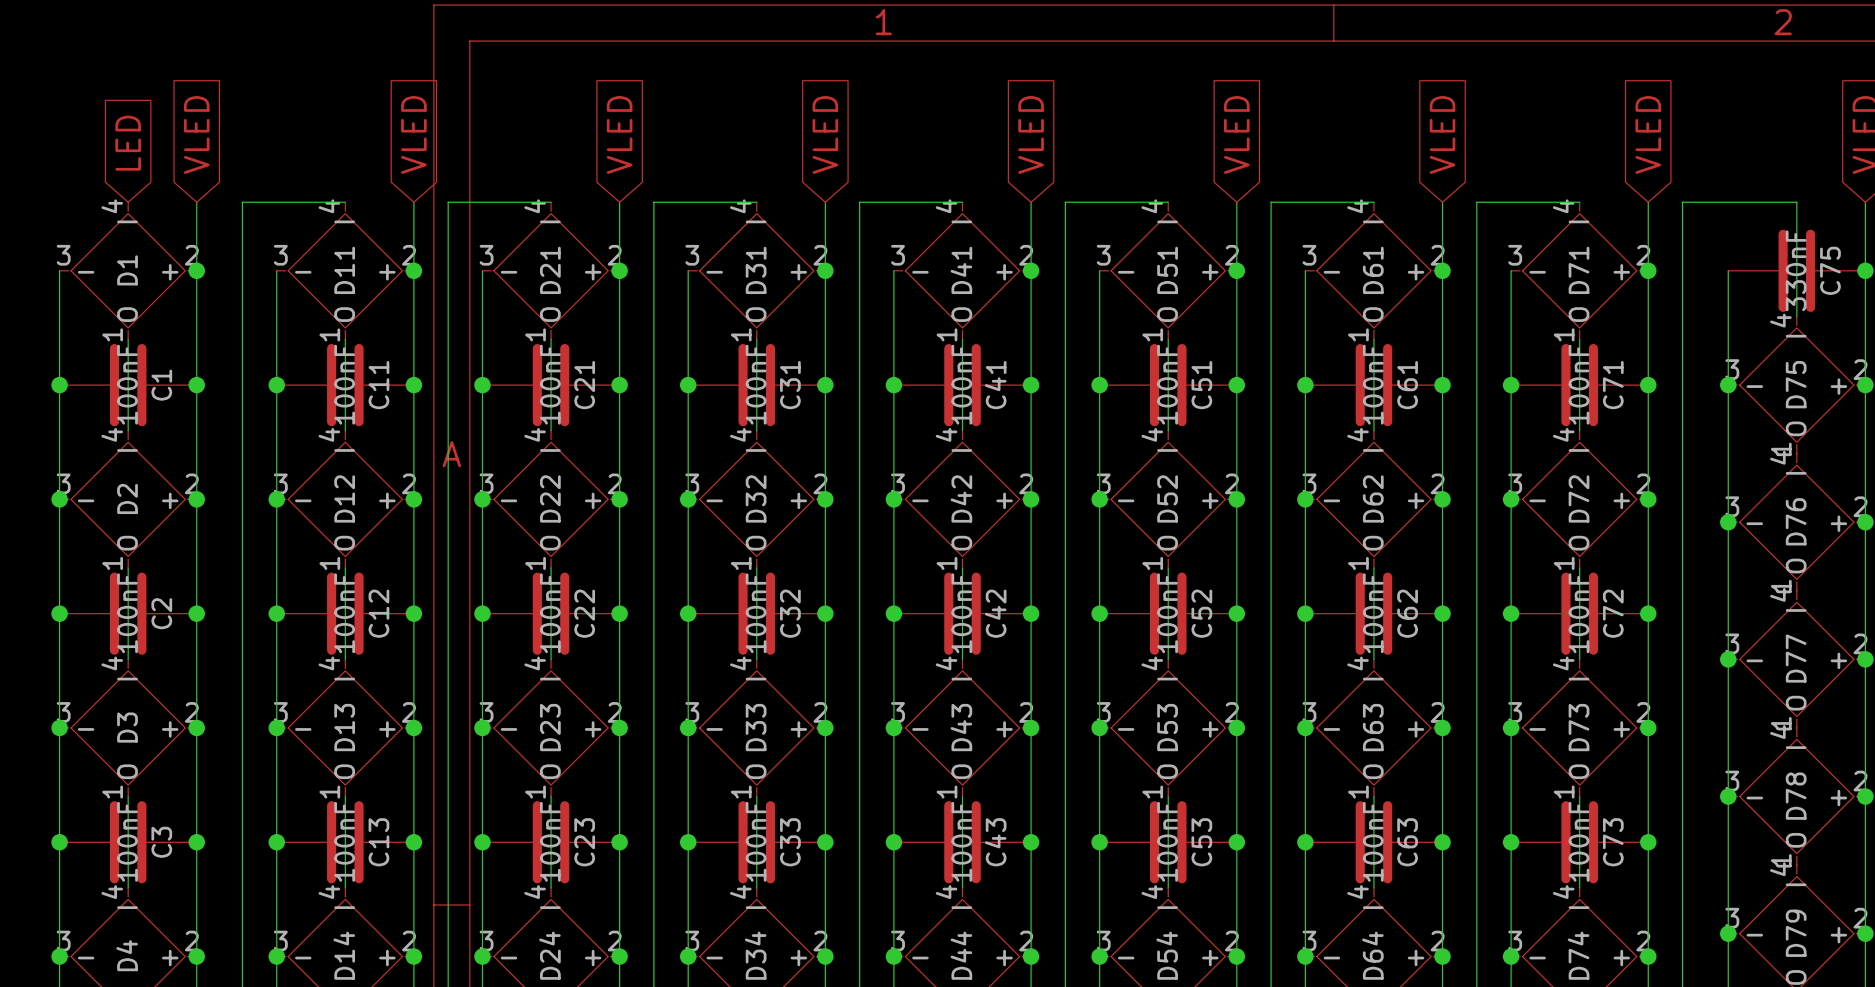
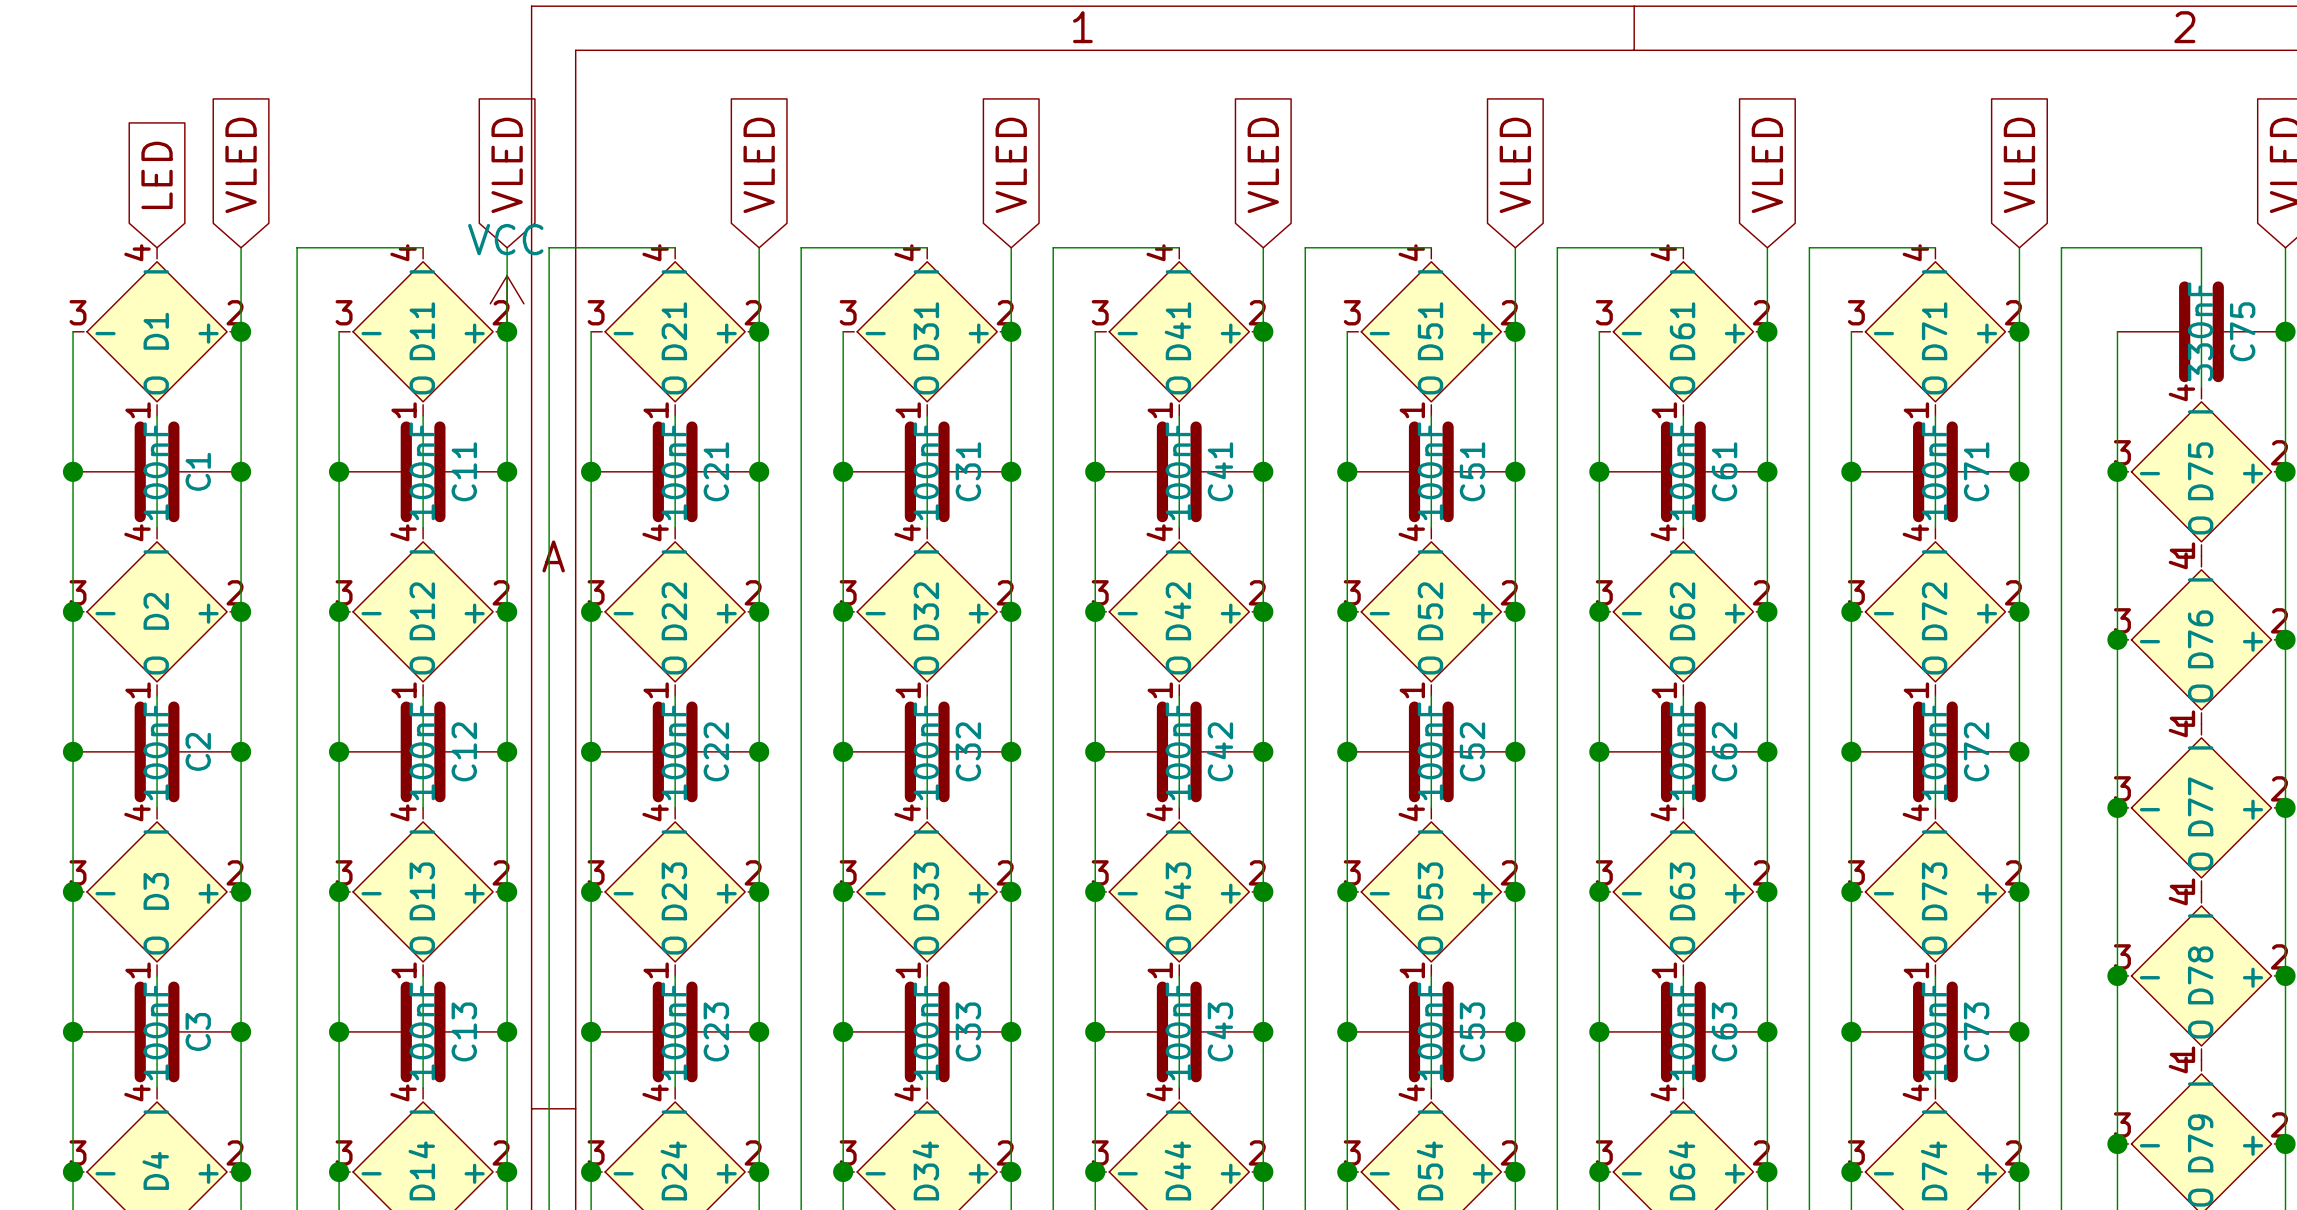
power symbol: none -> VCC (507, 303)

